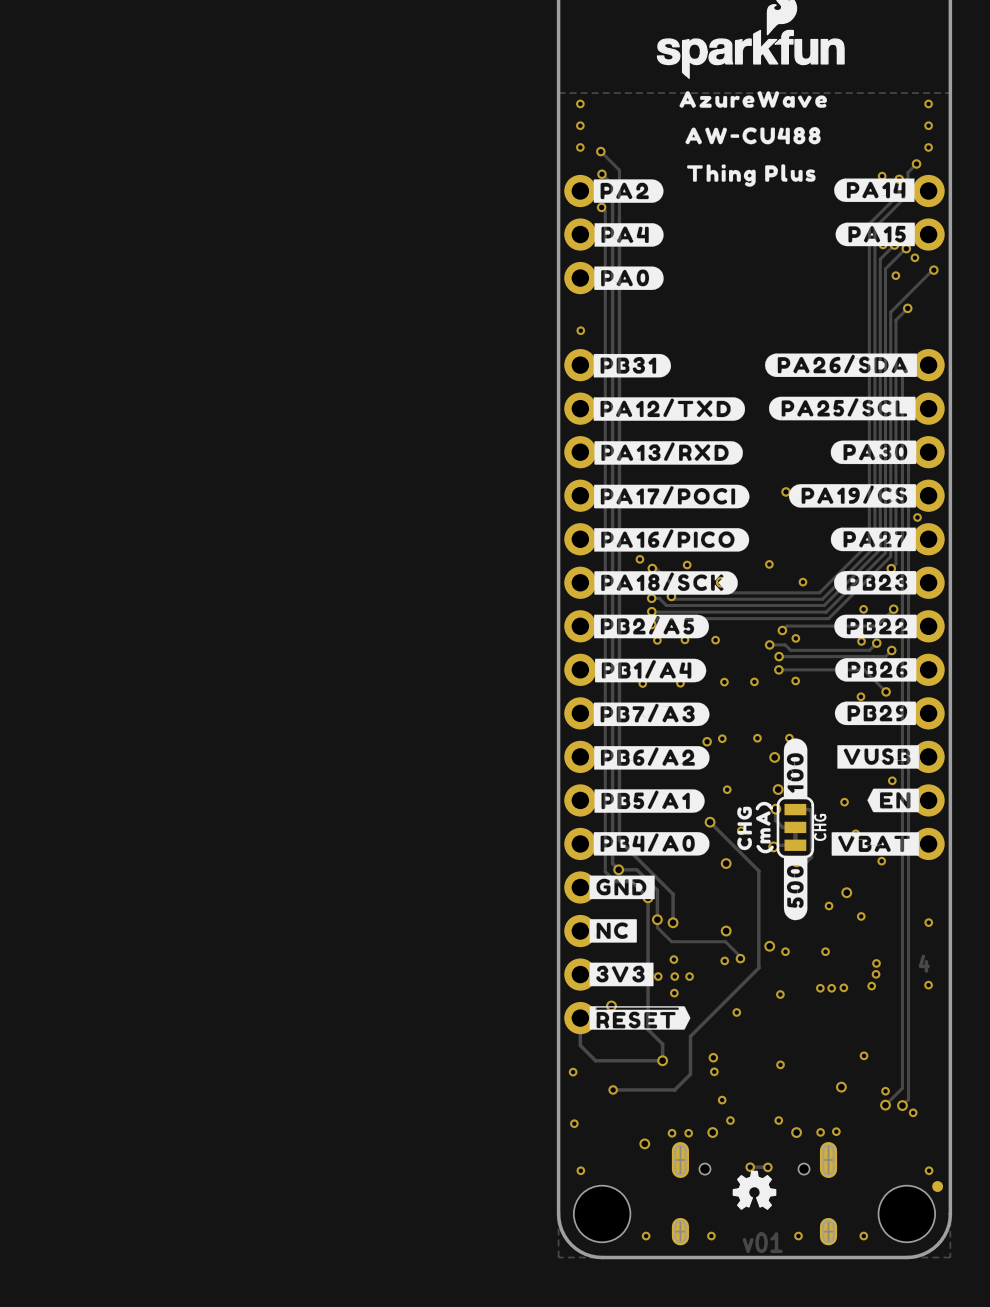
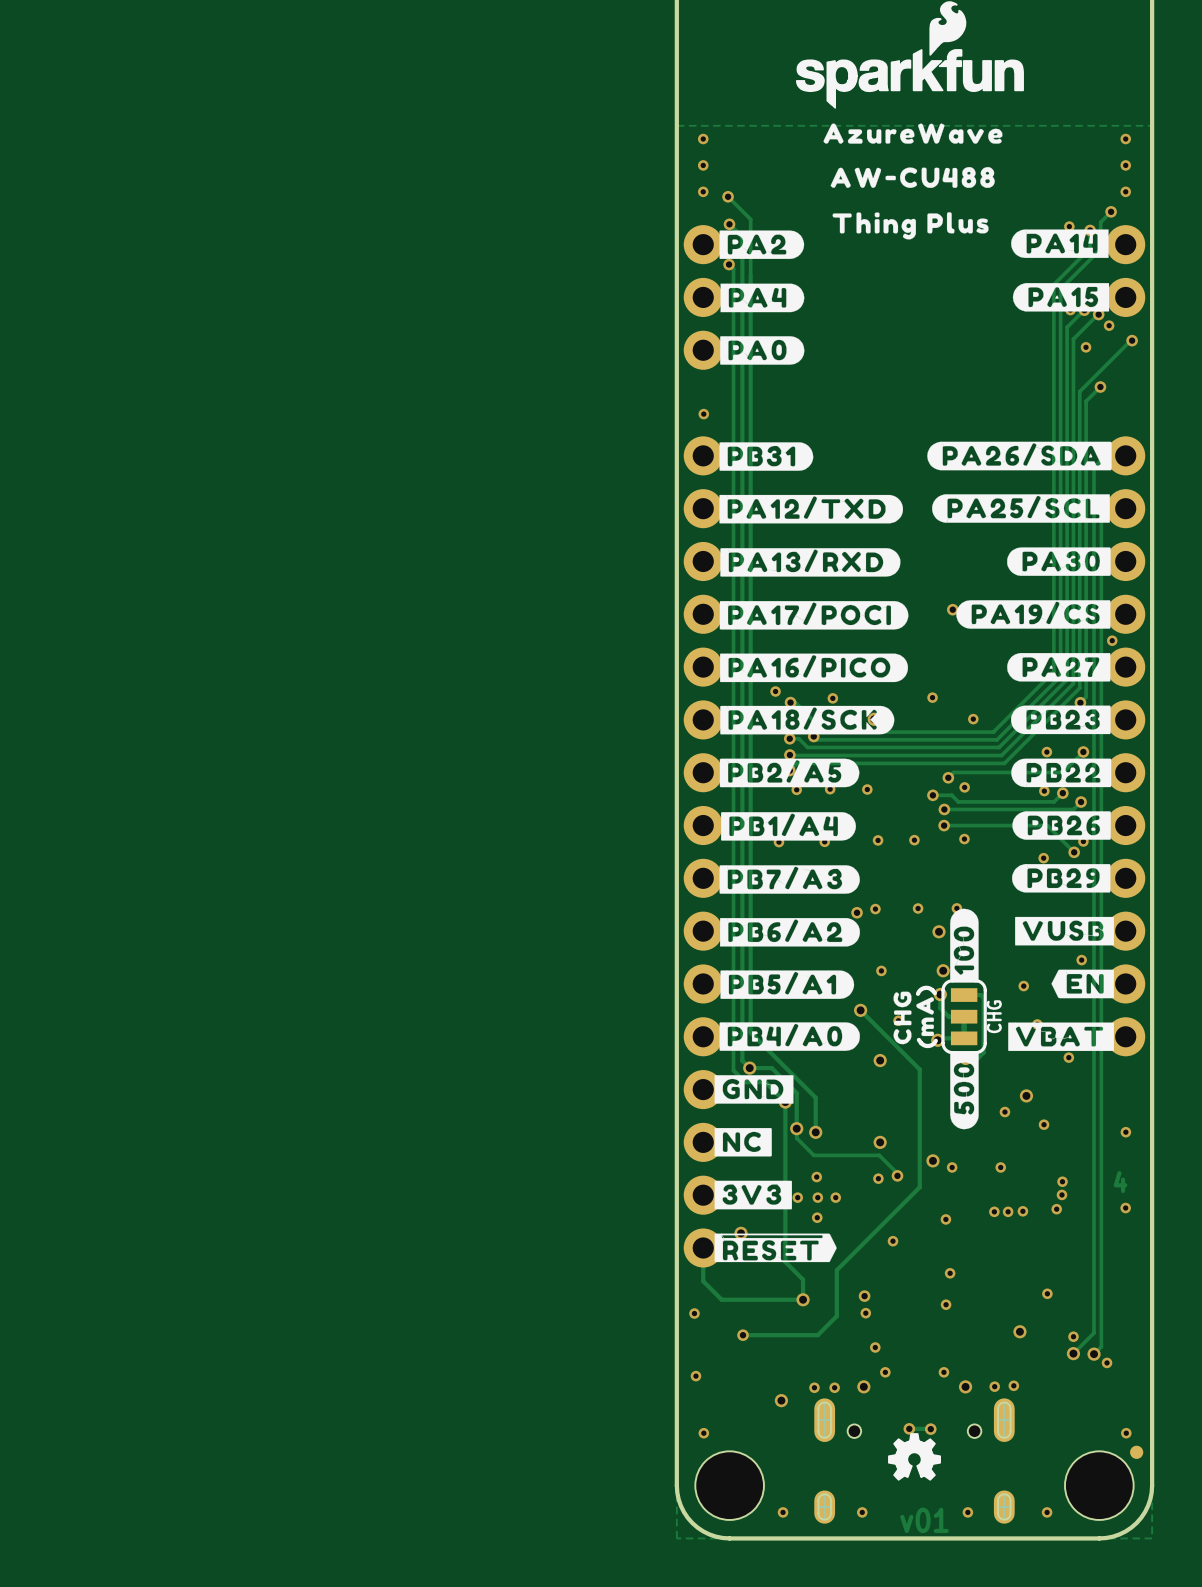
via: none -> (1083, 841)
via: none -> (950, 1273)

